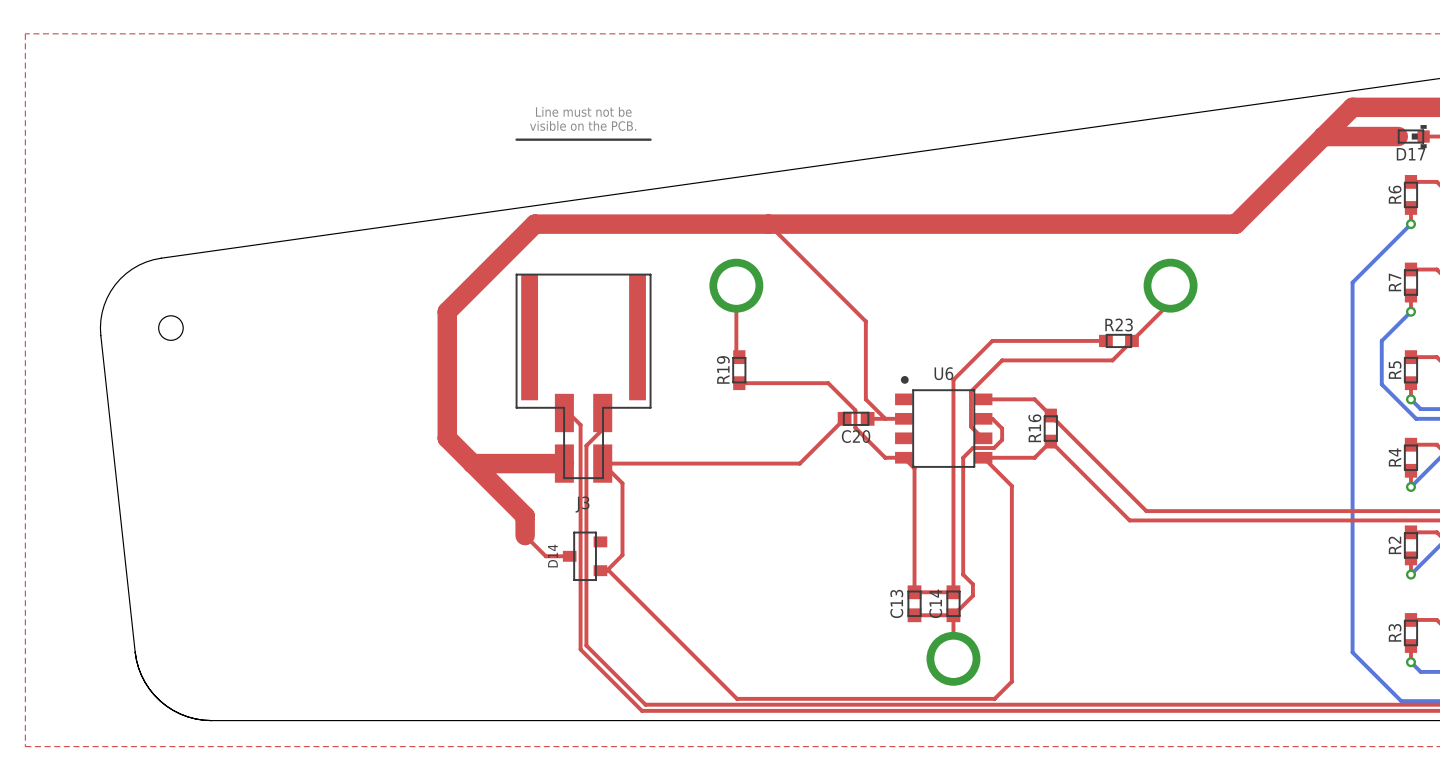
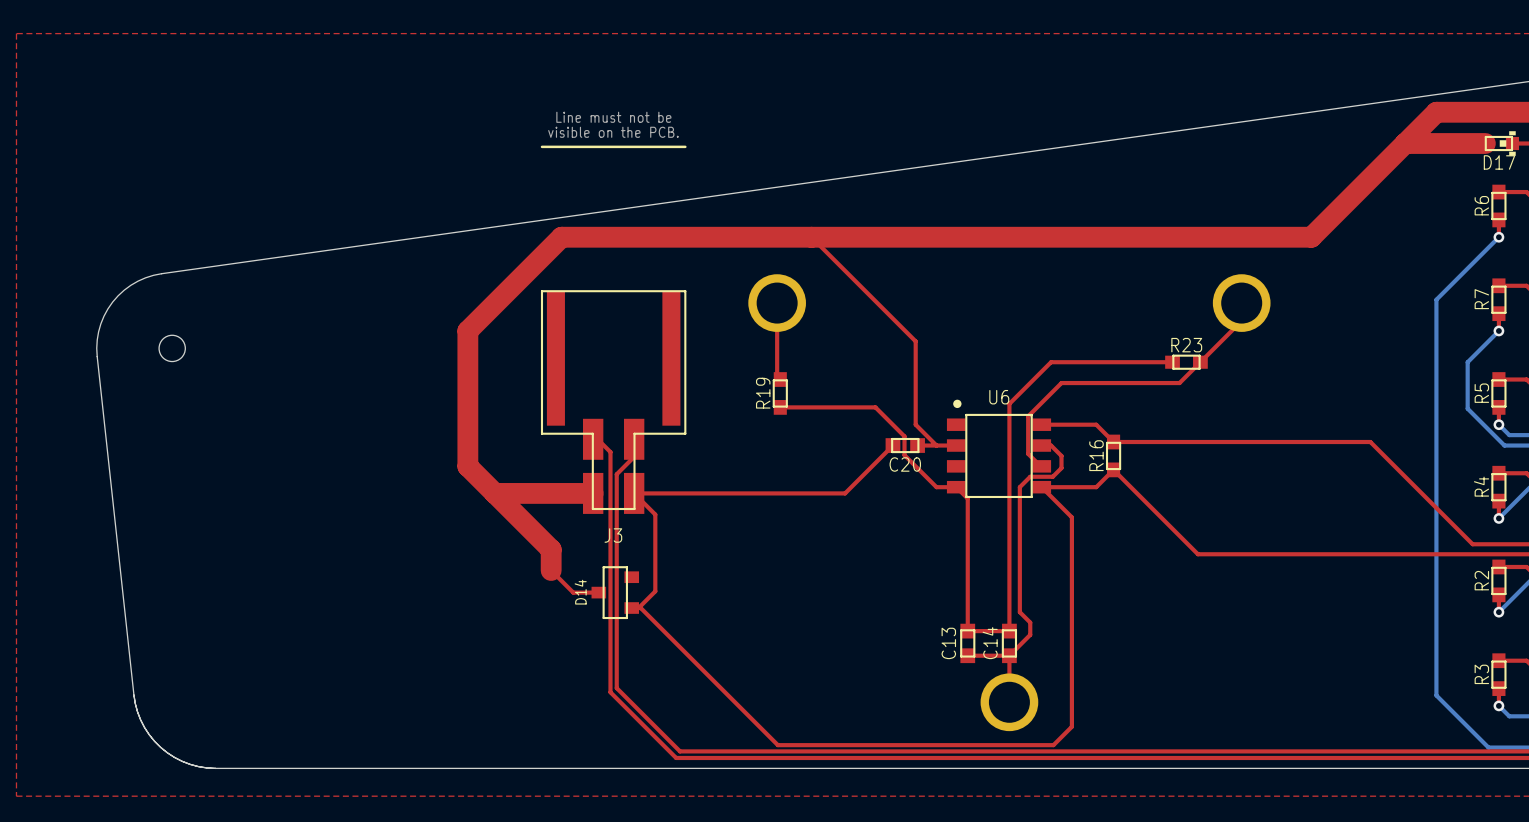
top track: (1050, 415) (1146, 511) (1386, 511) -> (1113, 442) (1370, 442) (1472, 544)

